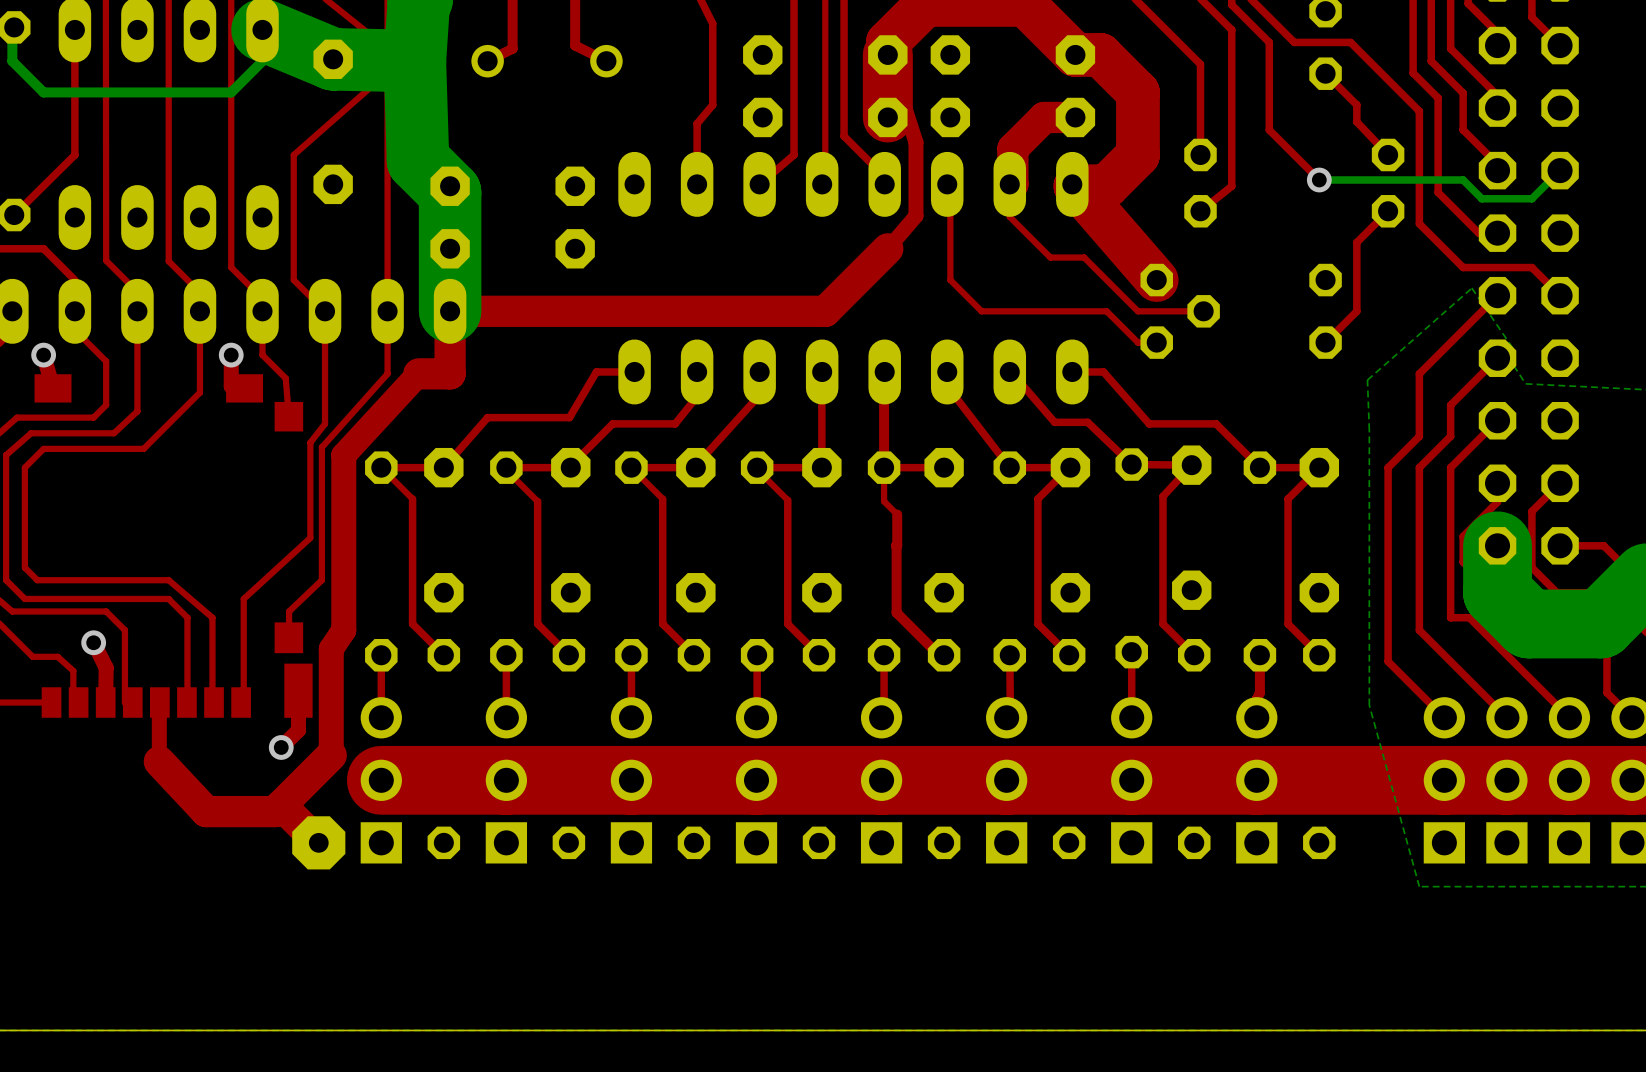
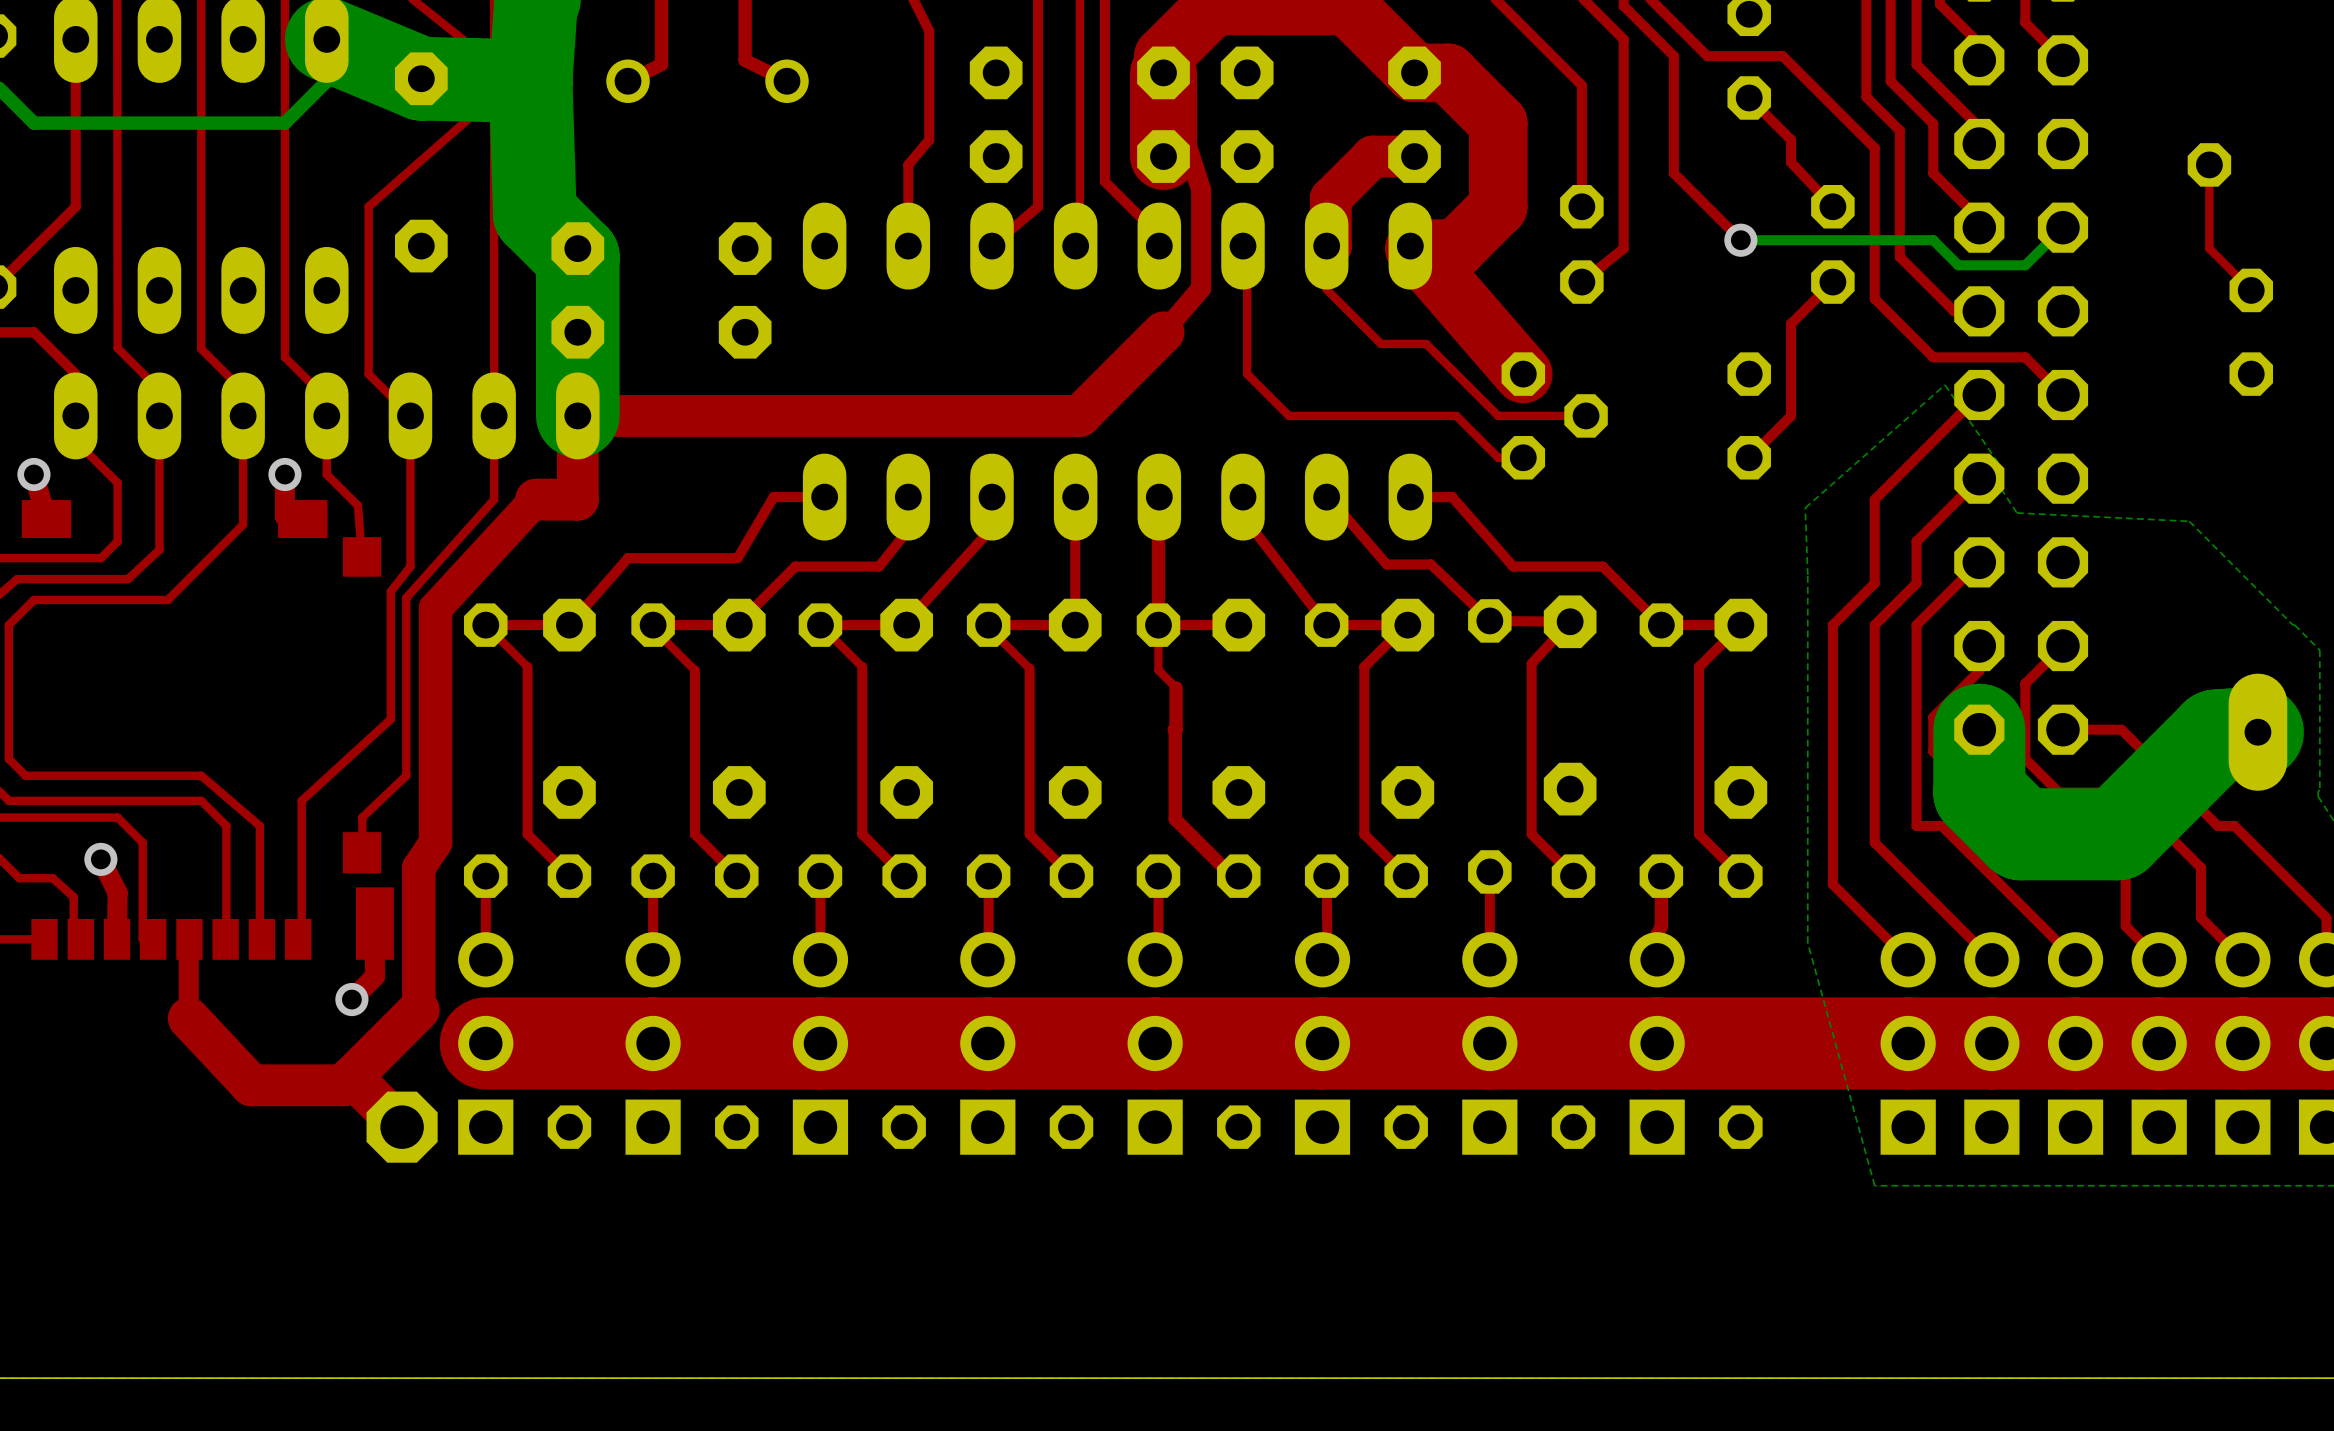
part footprint: [292, 816, 346, 870] -> [366, 1091, 438, 1163]

